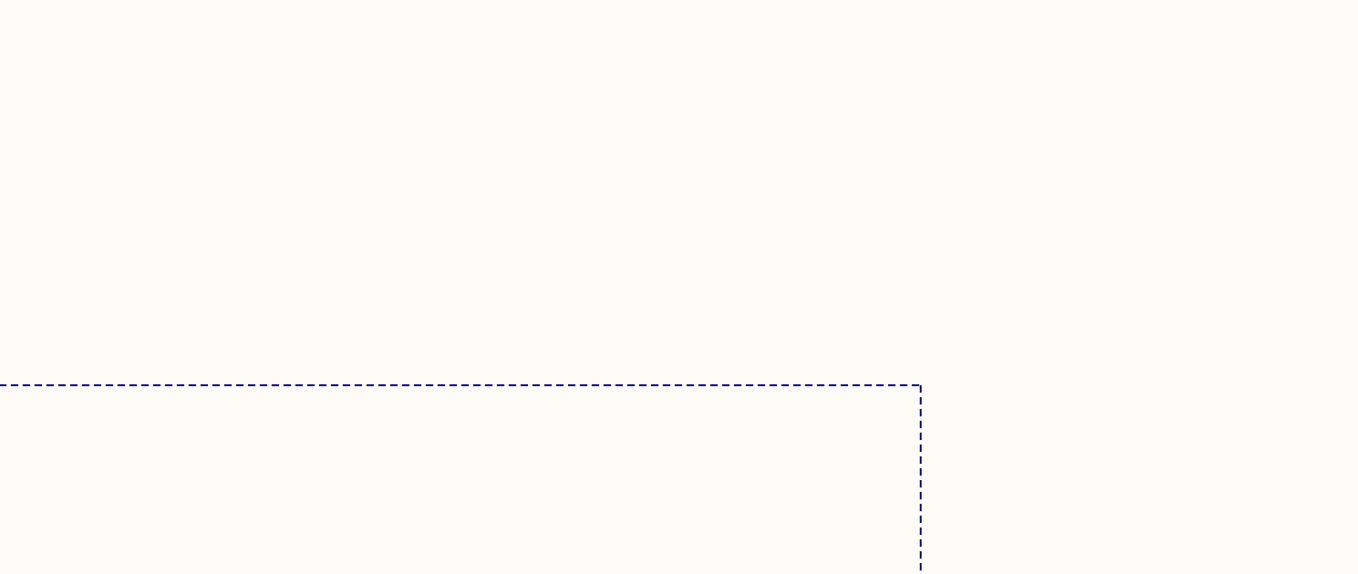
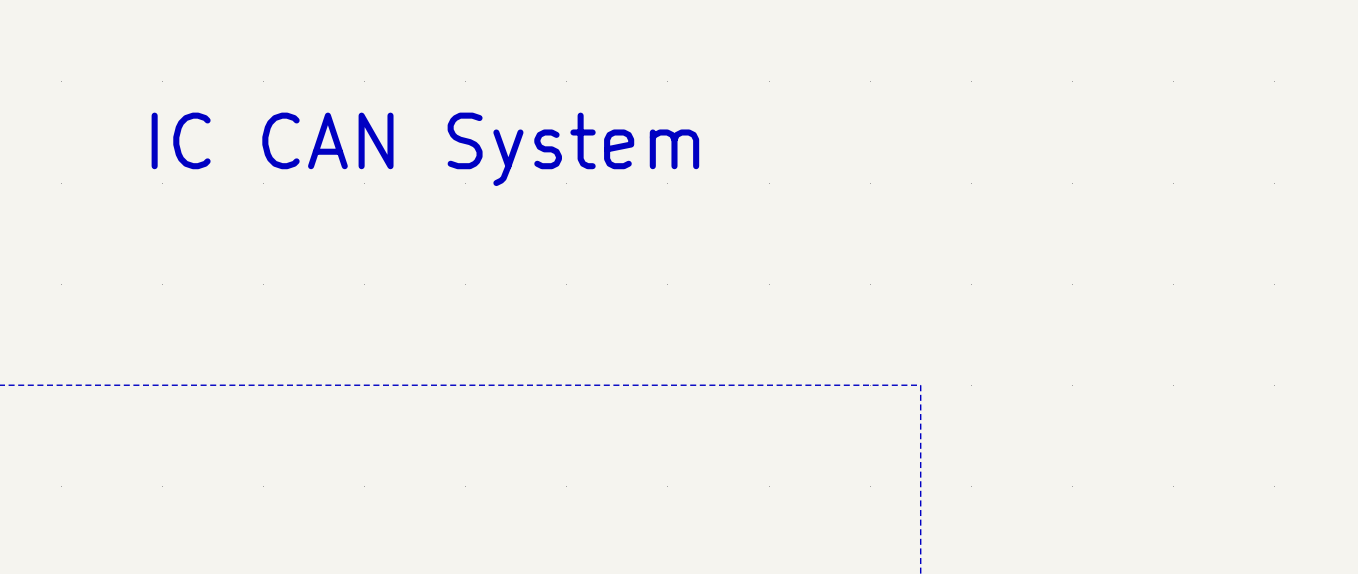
text: none -> IC CAN System (425, 149)

